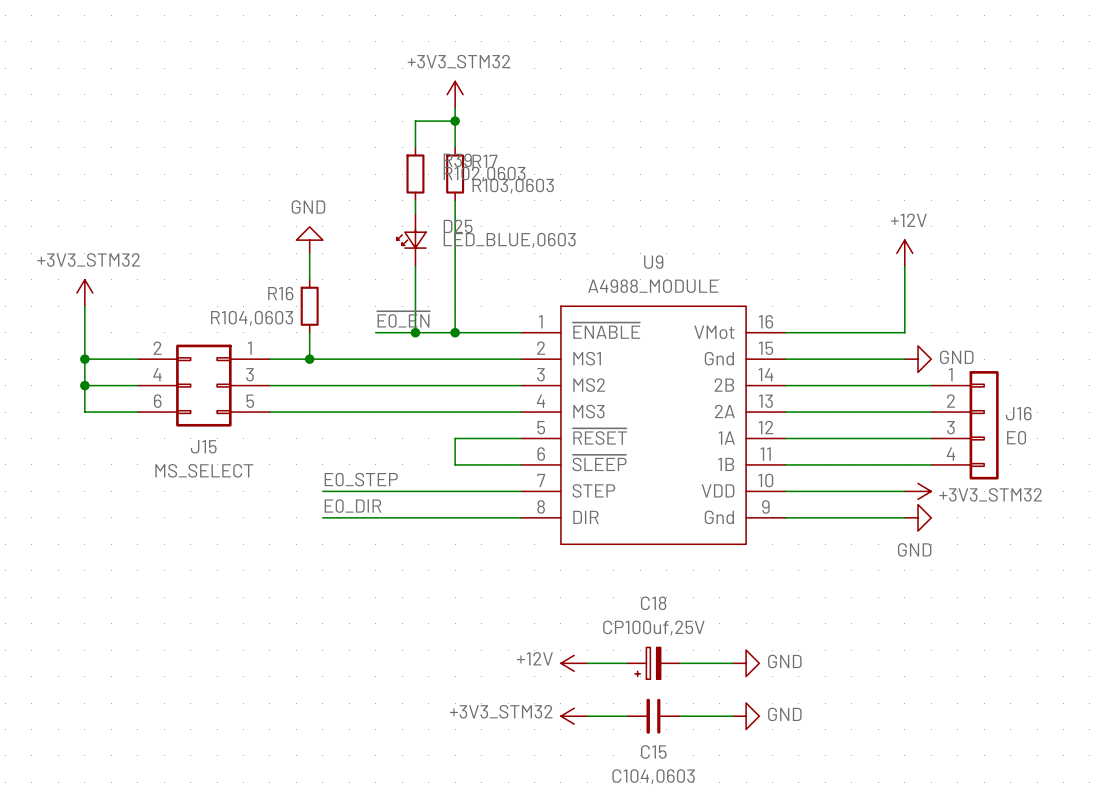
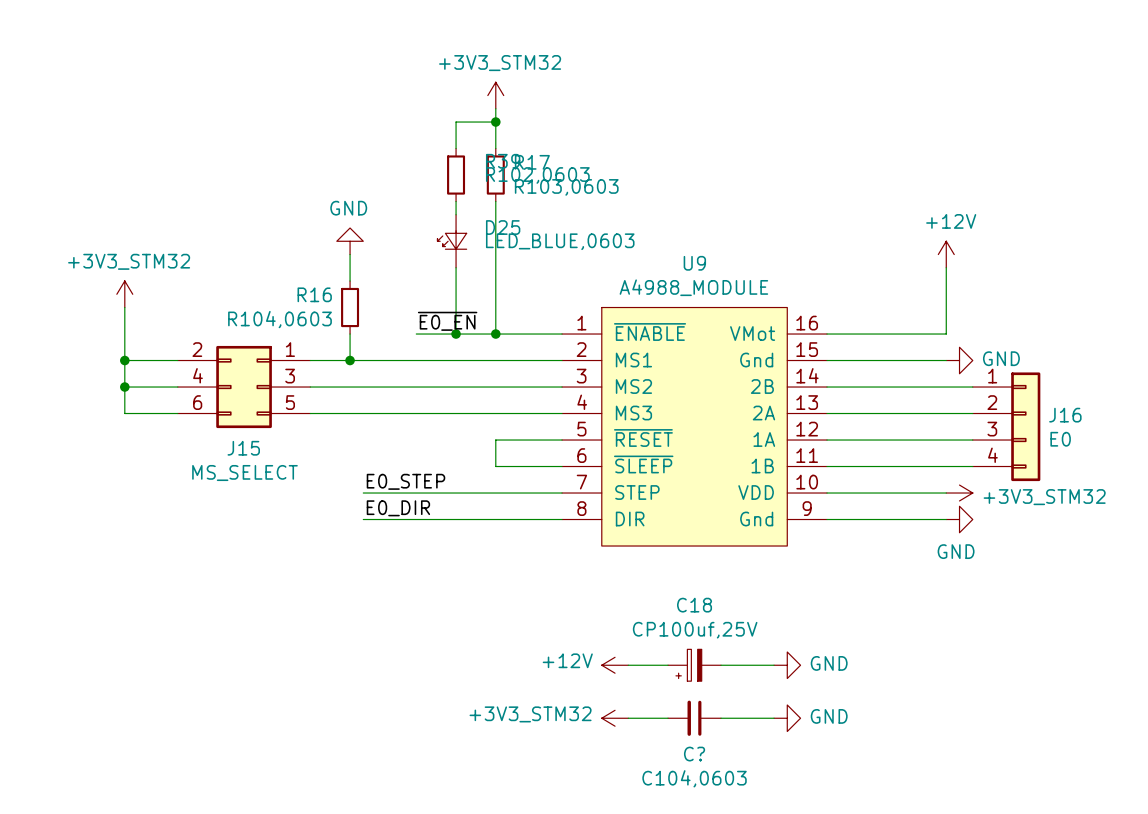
C15 name: C15 (653, 751) -> C? (694, 754)

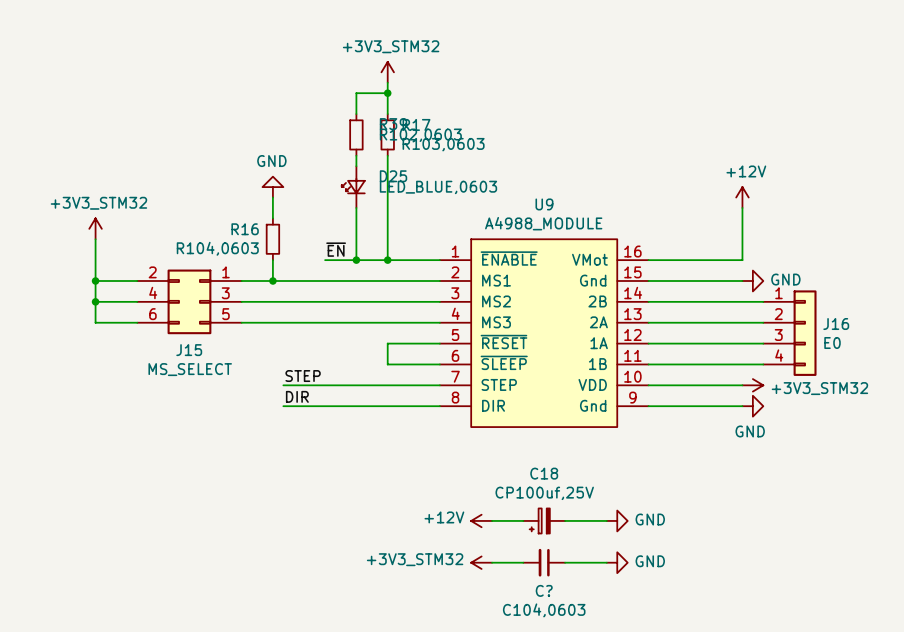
label: ~{E0_EN} (447, 321) -> ~{EN} (336, 249)
label: E0_STEP (405, 481) -> STEP (303, 376)
label: E0_DIR (398, 508) -> DIR (297, 396)

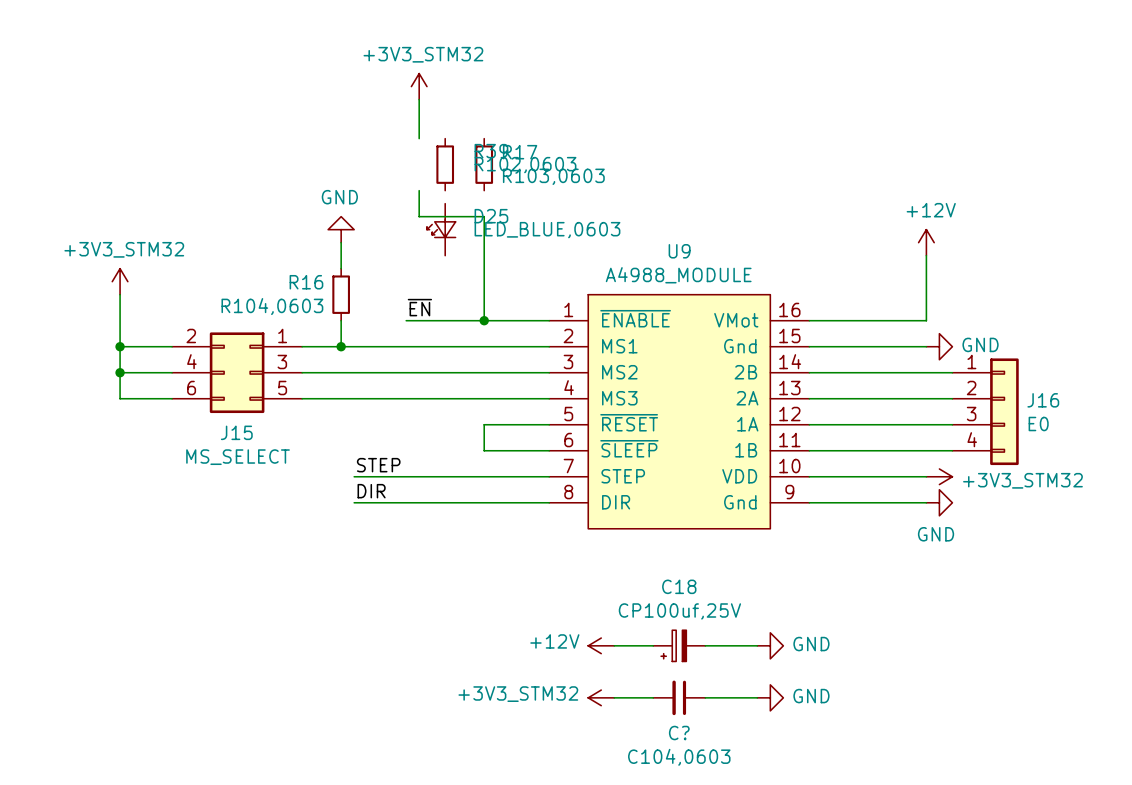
power symbol position: +3V3_STM32 (387, 72) -> +3V3_STM32 (419, 86)
wire: (387, 82) (387, 114) -> (419, 99) (419, 138)
wire: (387, 93) (356, 93) (356, 114) -> none
junction: (387, 93) -> none
wire: (356, 155) (356, 166) -> none
wire: (387, 155) (387, 176) -> (419, 190) (419, 216) (484, 216)
wire: (356, 207) (356, 260) -> none
junction: (356, 260) -> none

